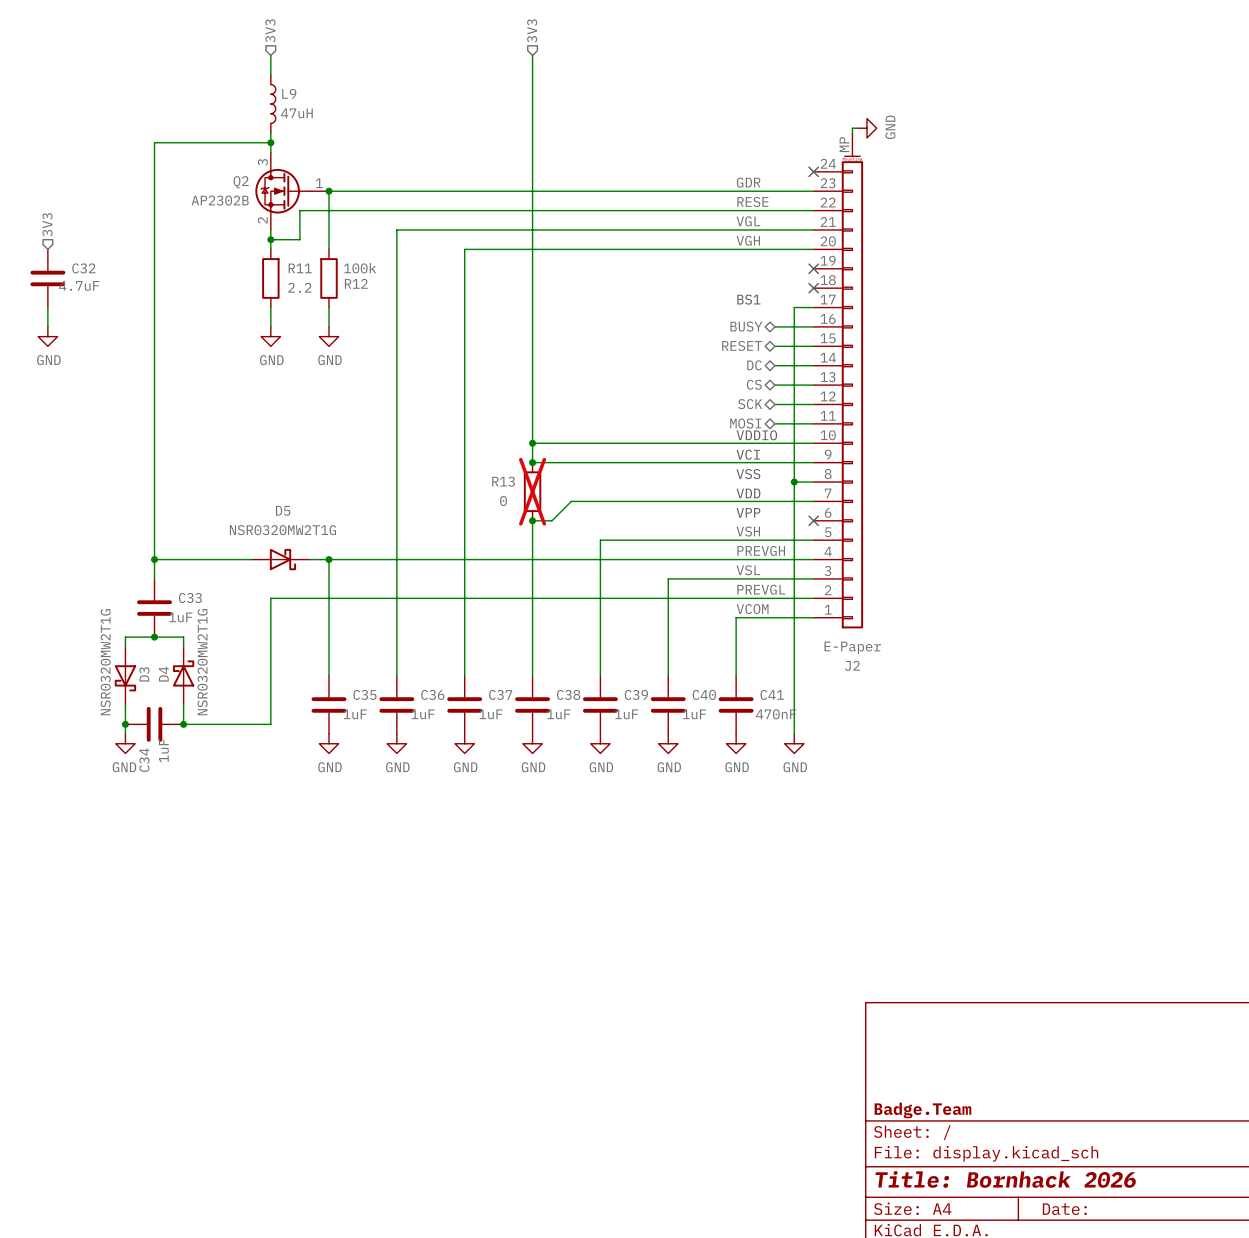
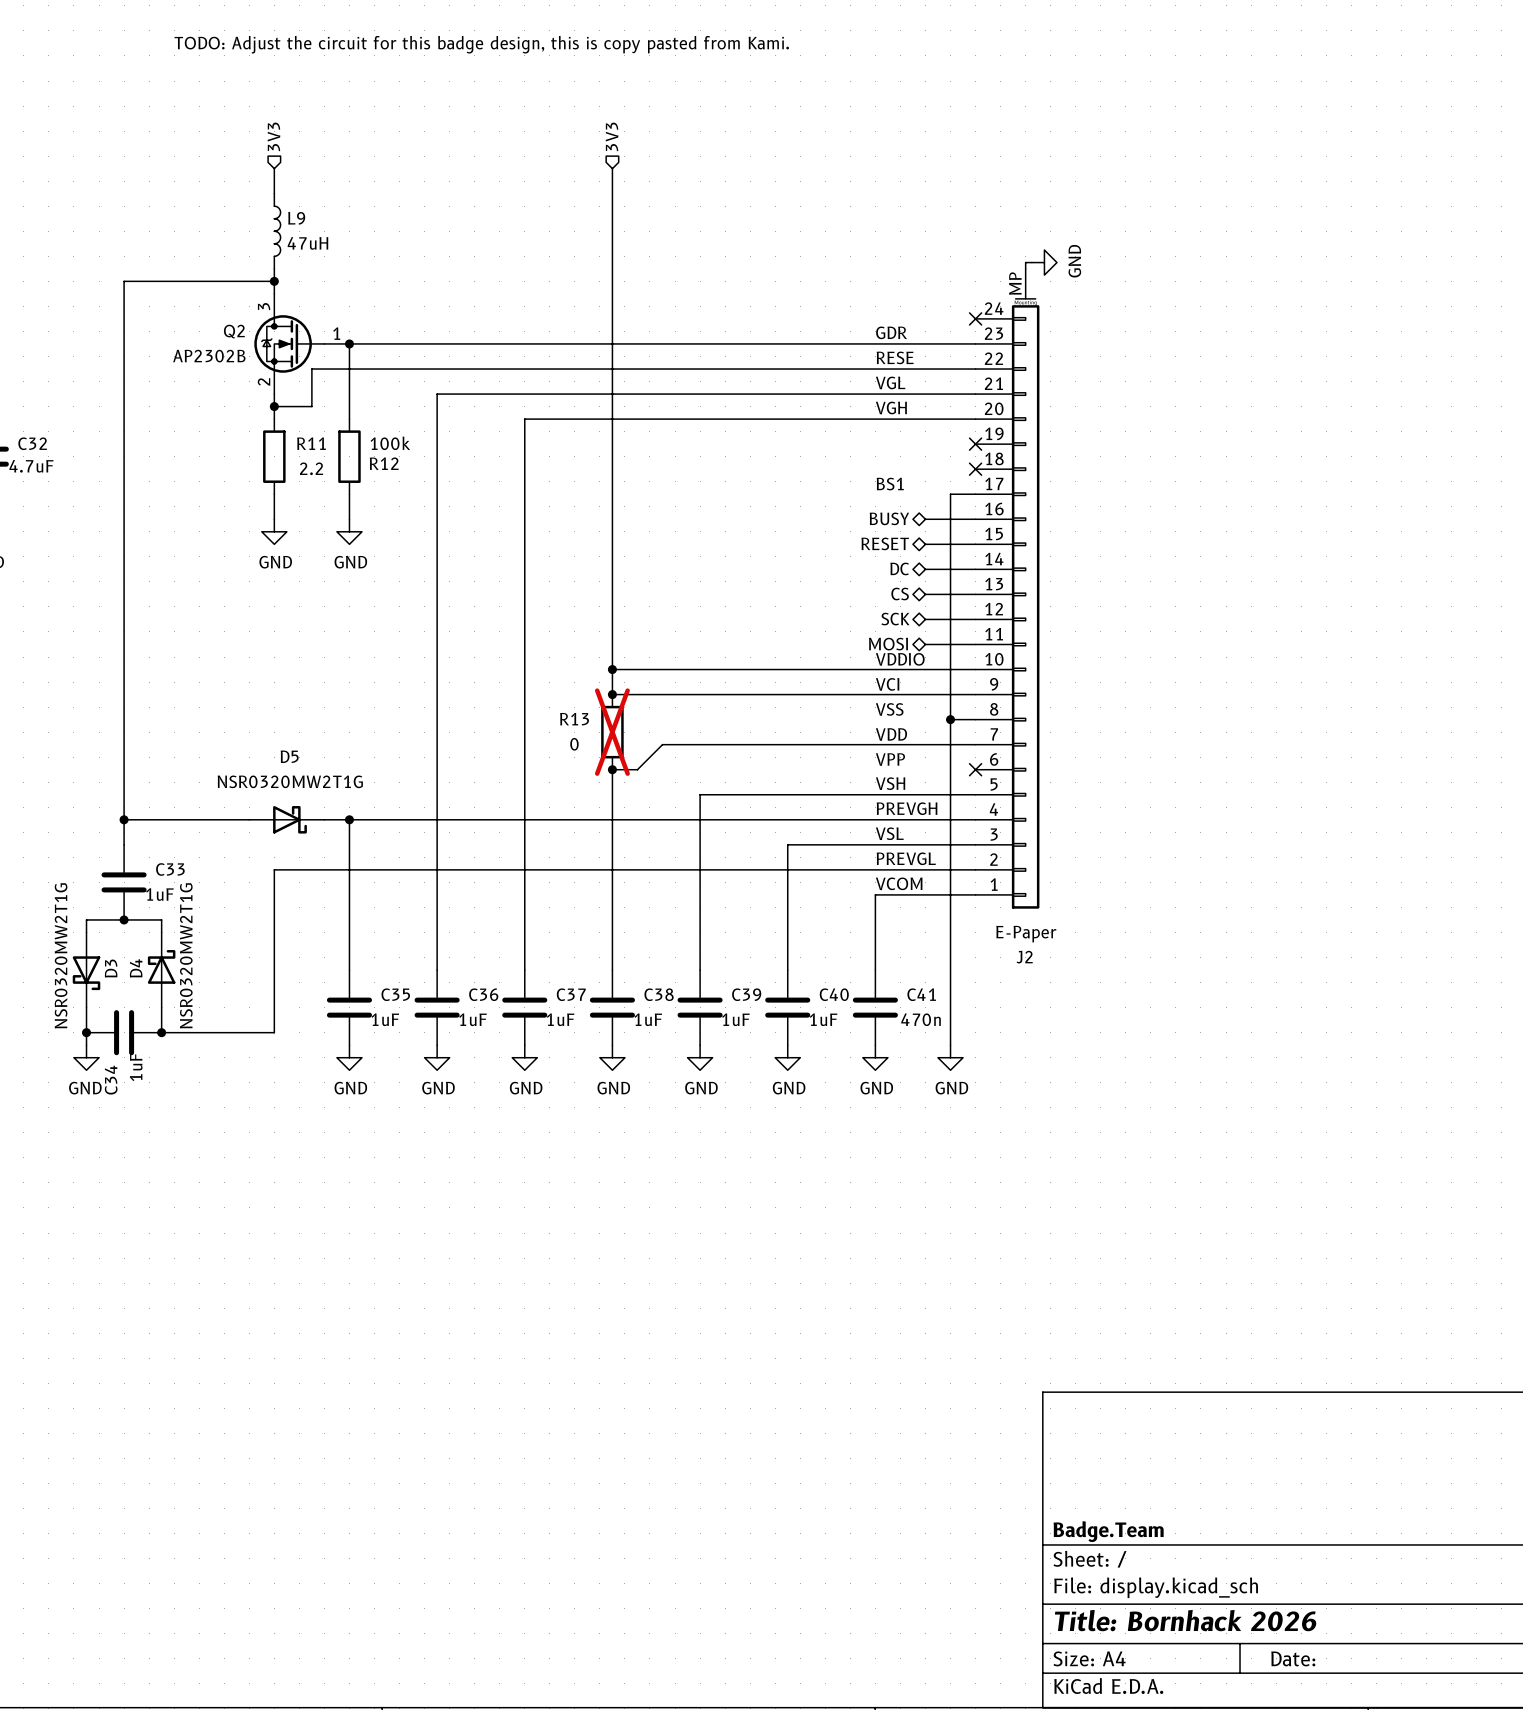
C41 value: 470nF (776, 714) -> 470n (921, 1019)

